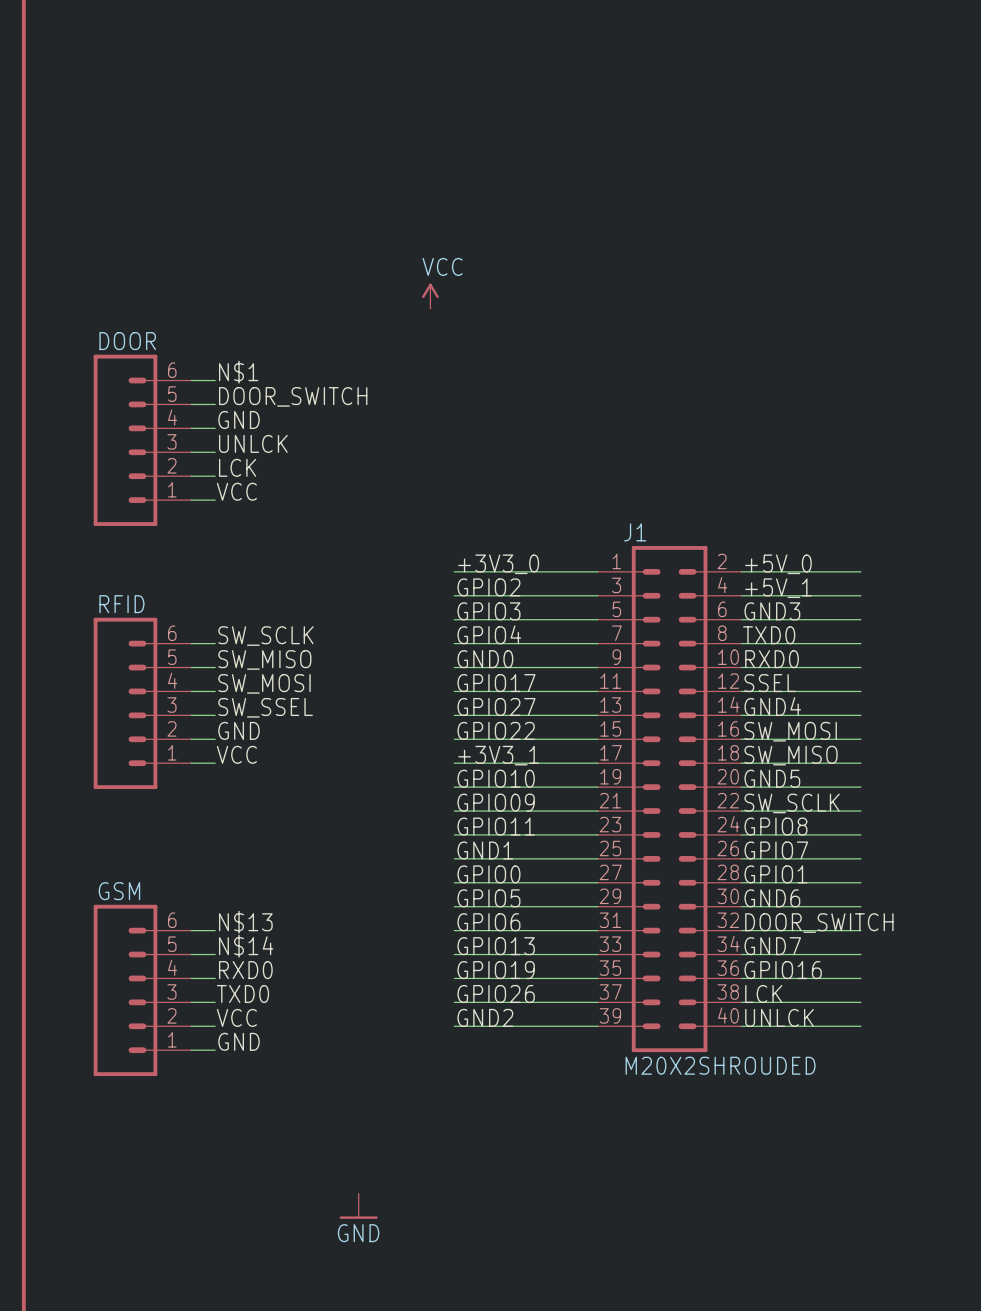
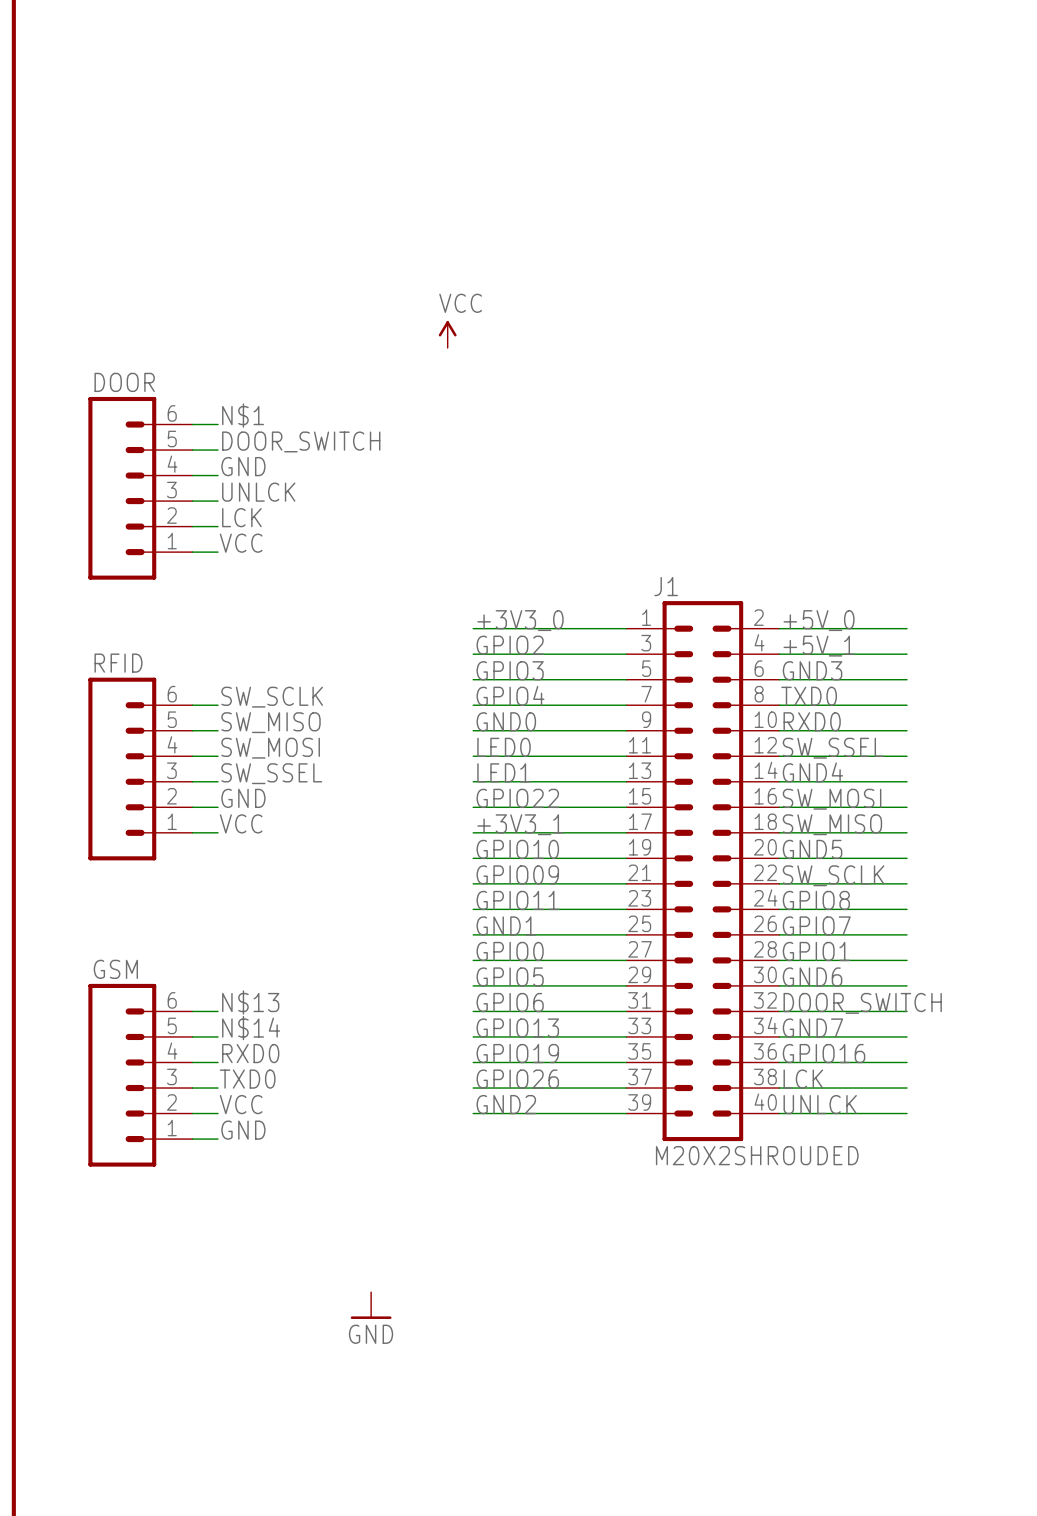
label: GPIO17 (496, 683) -> LED0 (504, 747)
label: SSEL (770, 683) -> SW_SSEL (833, 748)
label: GPIO27 (496, 706) -> LED1 (504, 772)

